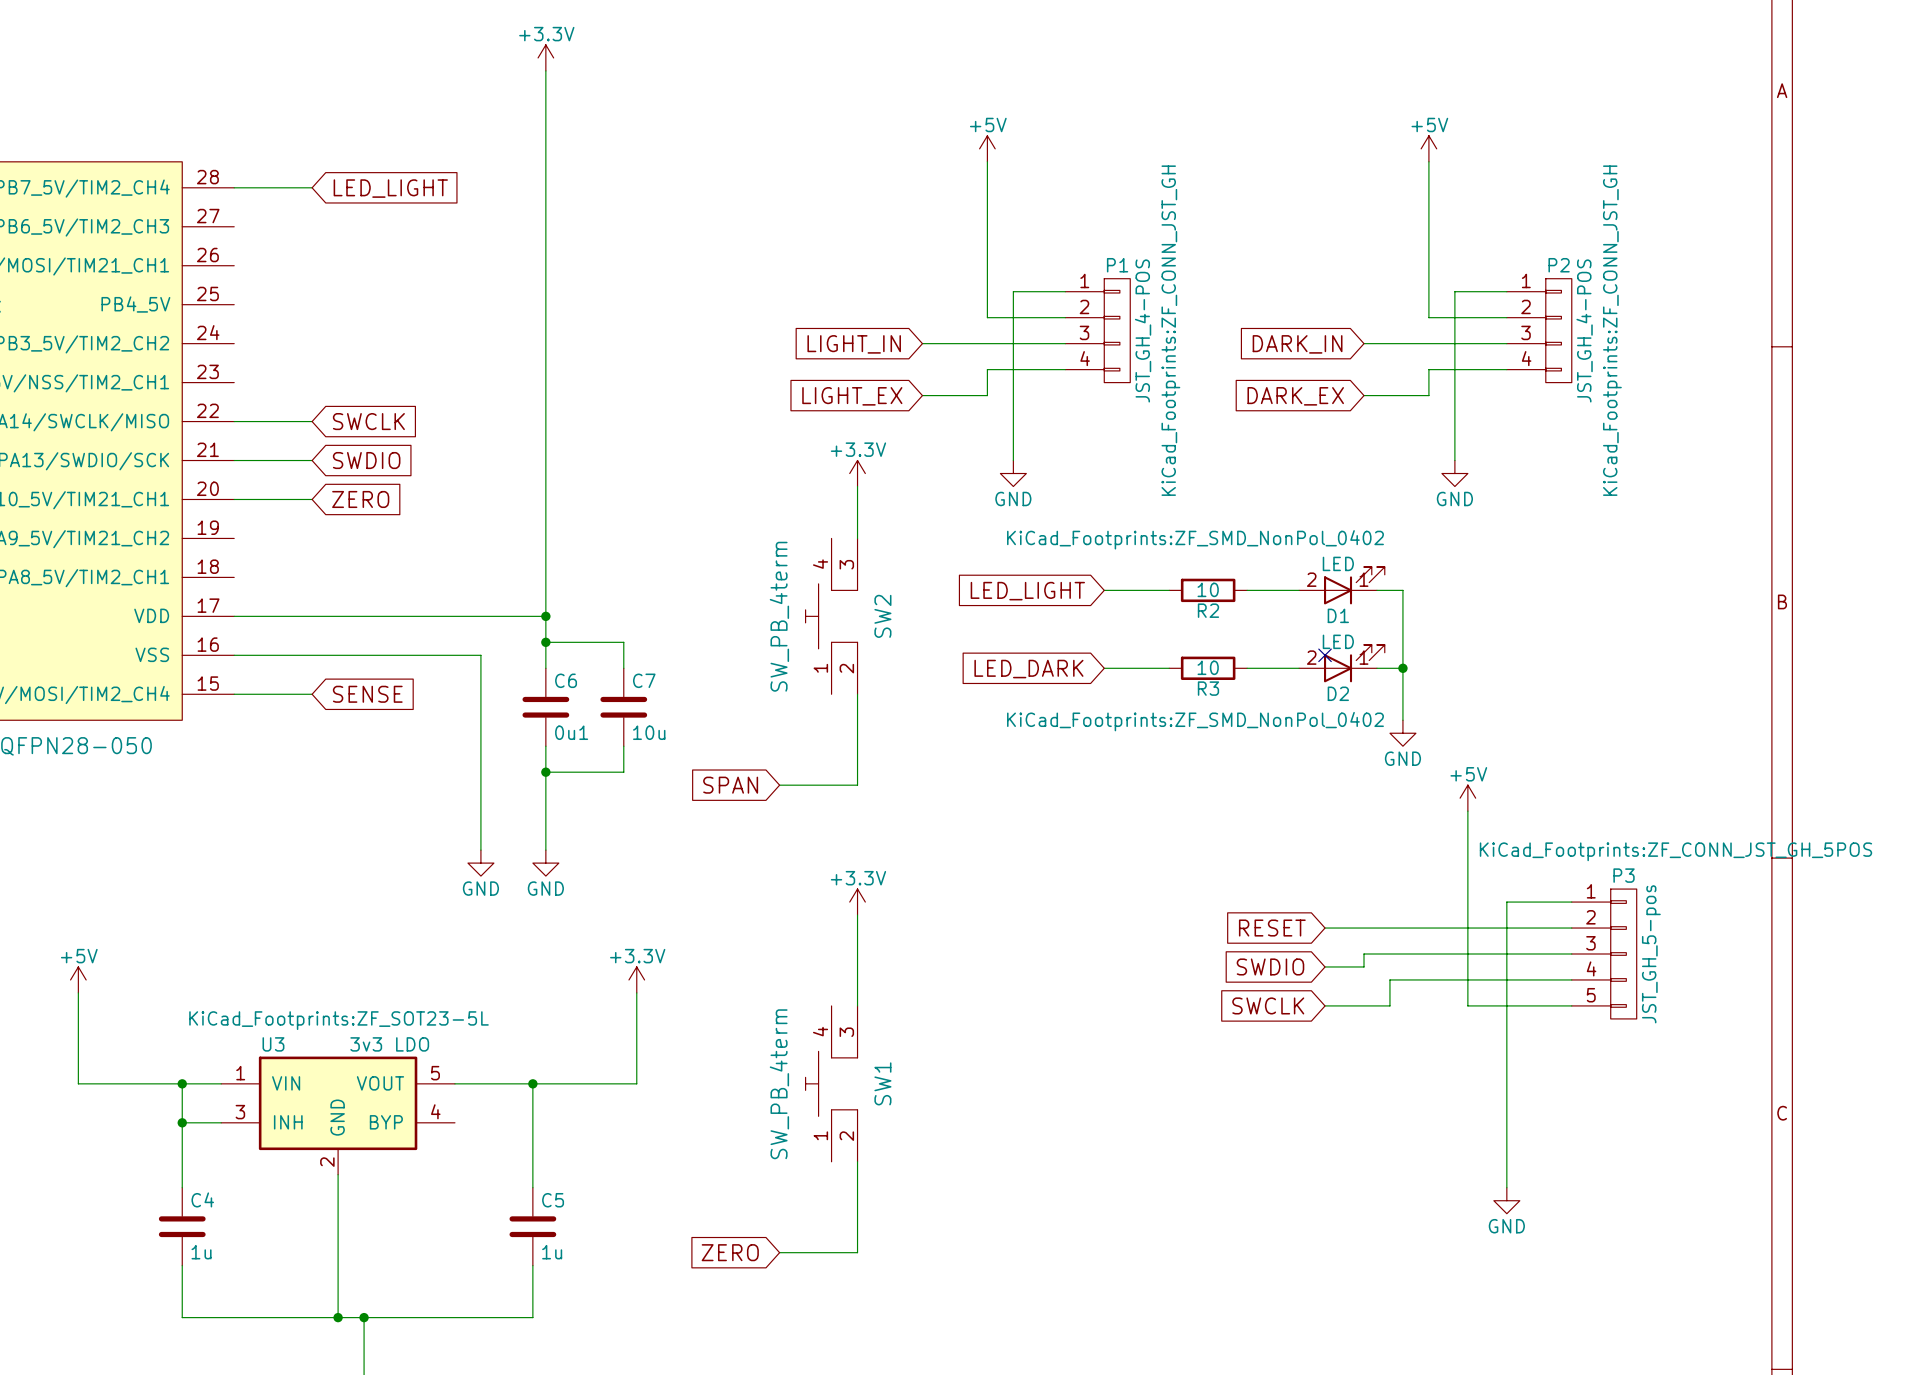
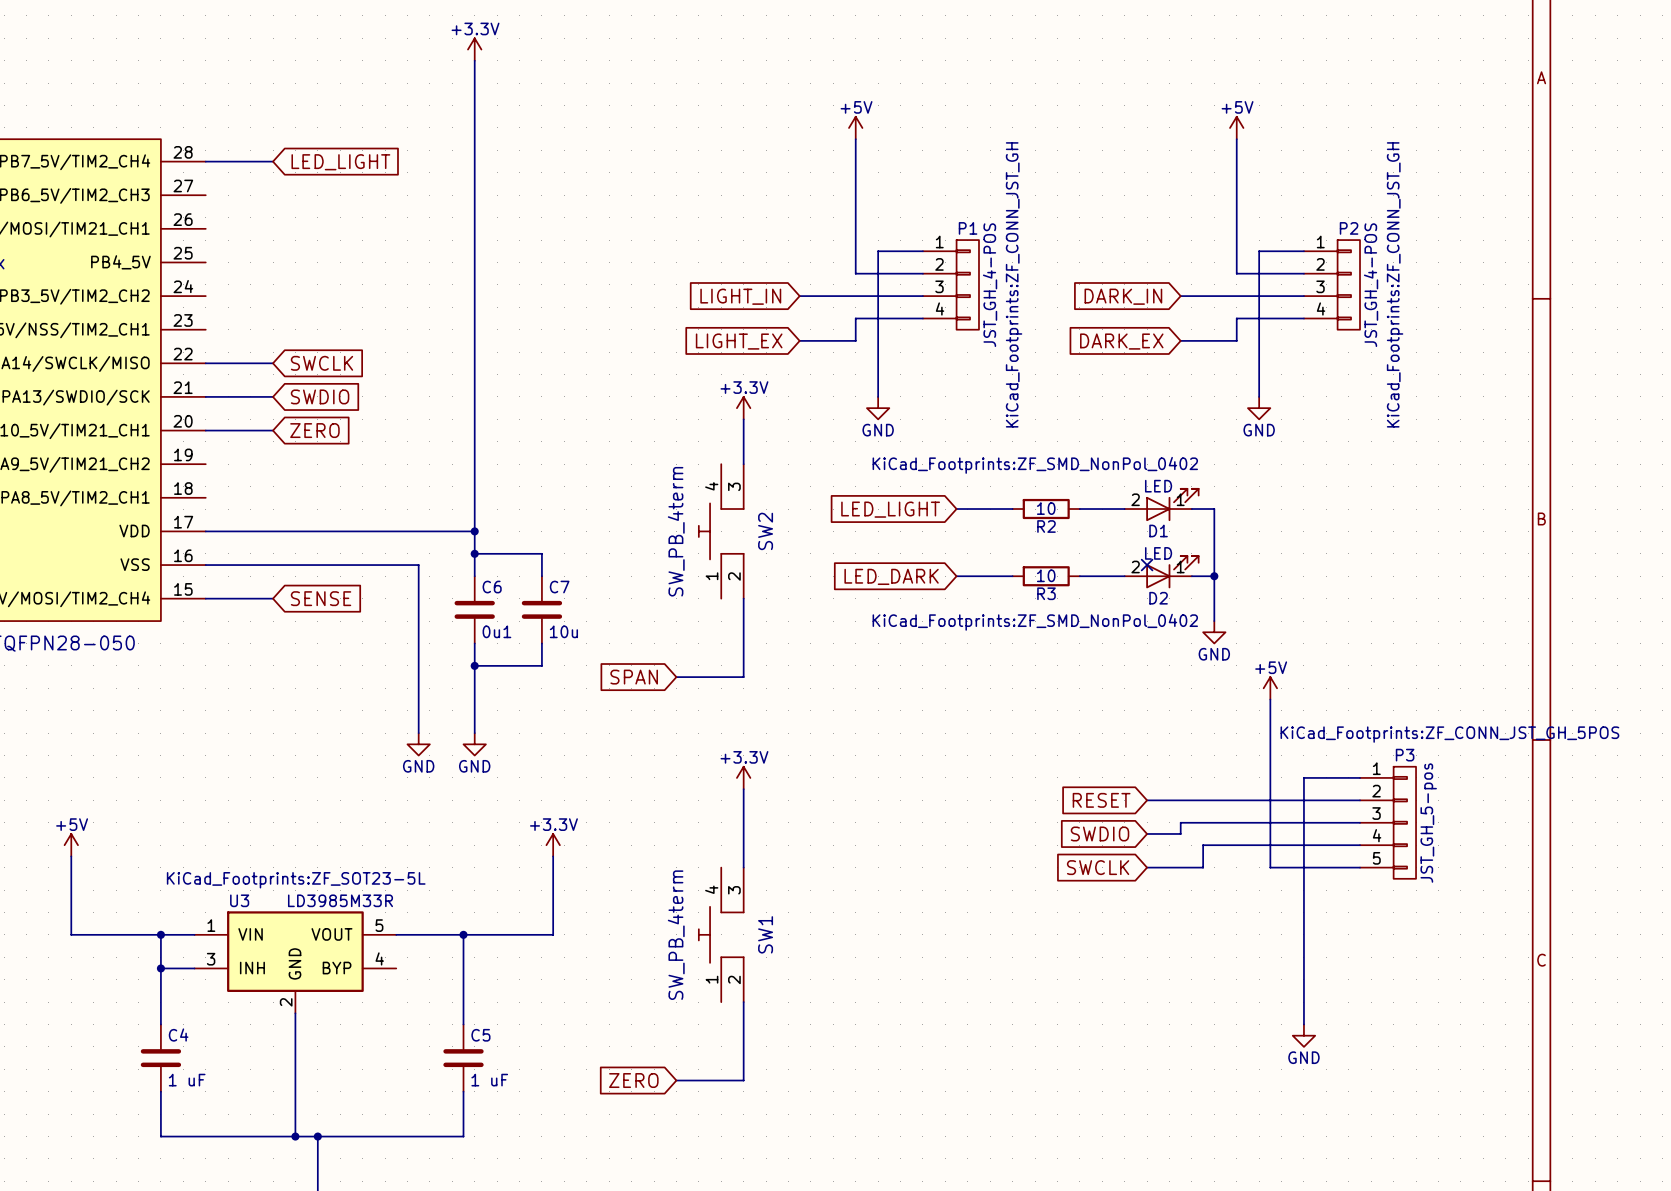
U3 value: 3v3 LDO (389, 1044) -> LD3985M33R (340, 900)
C4 value: 1u (201, 1252) -> 1 uF (187, 1080)
C5 value: 1u (552, 1252) -> 1 uF (489, 1080)

